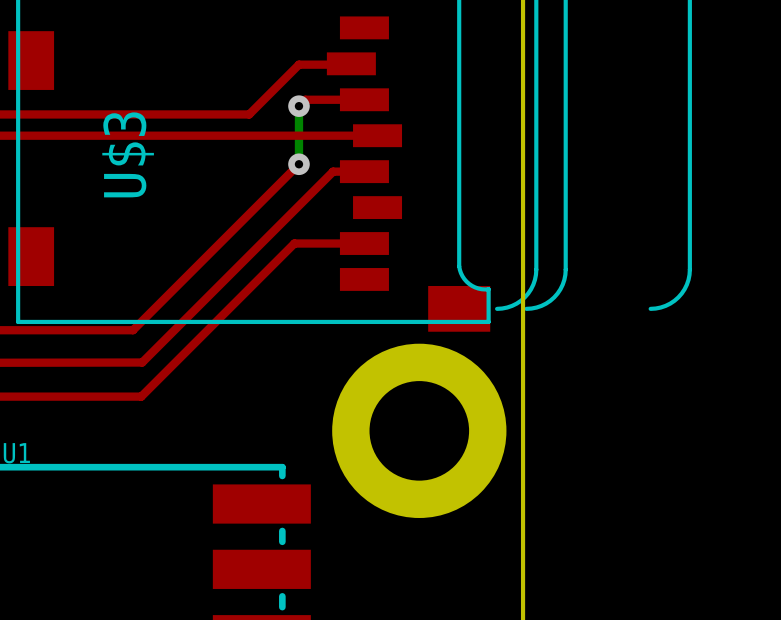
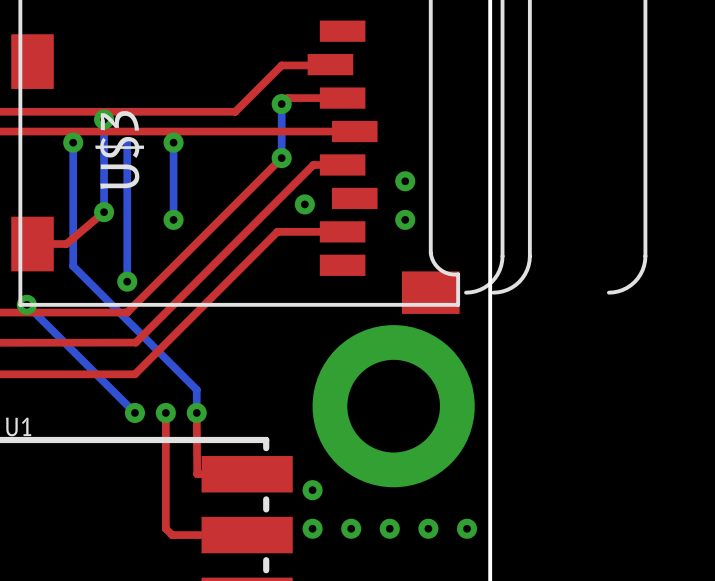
bottom track: none -> (104, 119) (104, 212)
via: none -> (104, 119)
bottom track: none -> (73, 142) (73, 266) (196, 389) (196, 412)
via: none -> (73, 142)
bottom track: none -> (127, 142) (127, 281)
bottom track: none -> (173, 142) (173, 219)
via: none -> (173, 142)
via: none -> (405, 181)
via: none -> (304, 204)
top track: none -> (104, 212) (66, 244) (32, 244)
via: none -> (104, 212)
via: none -> (173, 219)
via: none -> (405, 219)
via: none -> (127, 281)
bottom track: none -> (26, 304) (134, 412)
via: none -> (26, 304)
via: none -> (134, 412)
top track: none -> (165, 412) (165, 528) (172, 535) (247, 535)
via: none -> (165, 412)
top track: none -> (196, 412) (197, 474) (247, 474)
via: none -> (196, 412)
via: none -> (312, 490)
via: none -> (312, 528)
via: none -> (351, 528)
via: none -> (389, 528)
via: none -> (428, 528)
via: none -> (467, 528)

